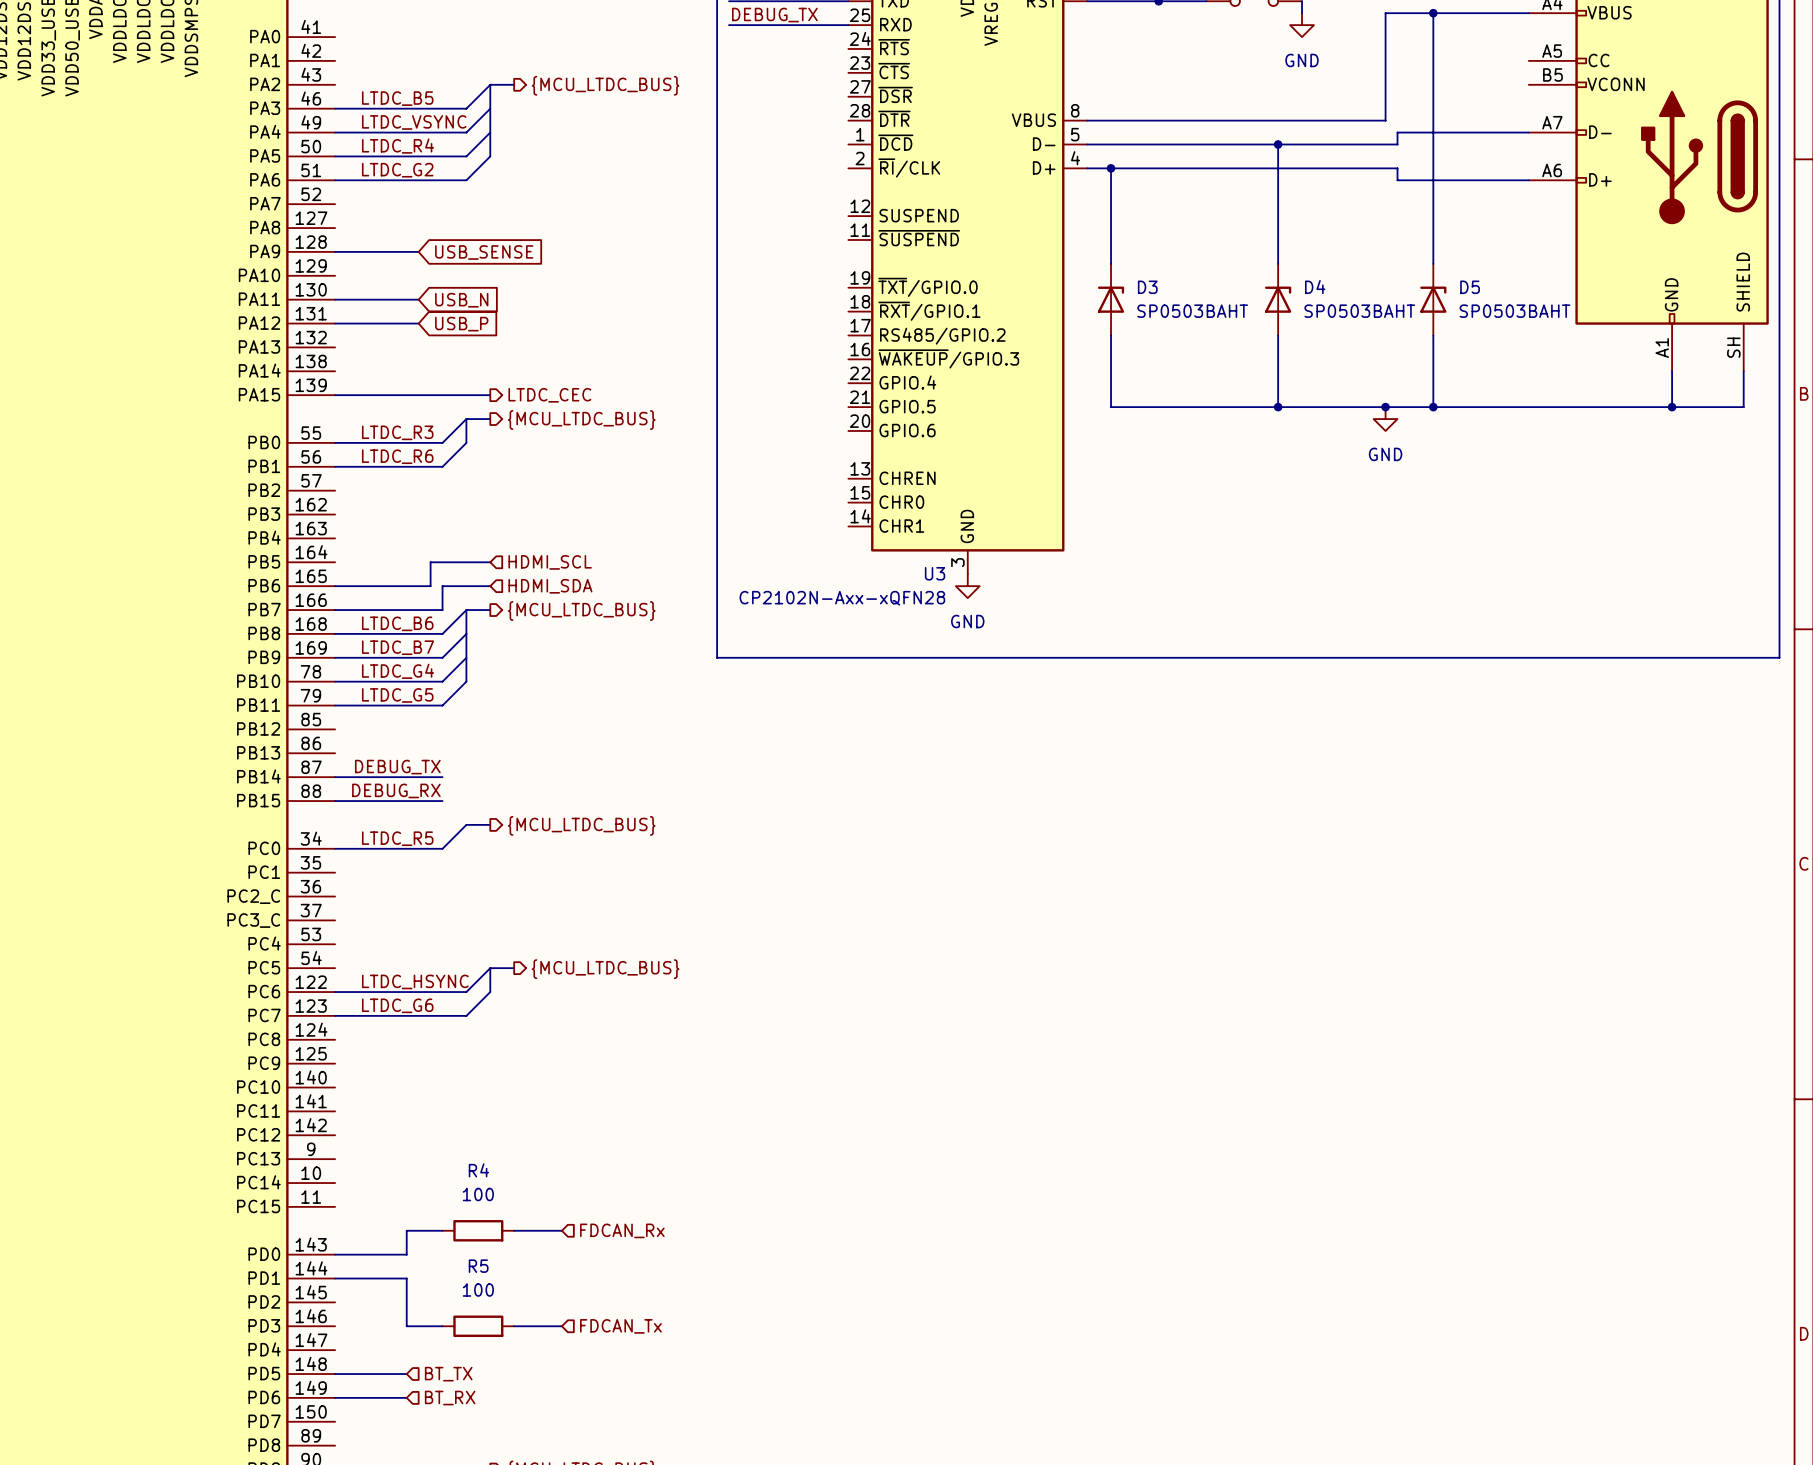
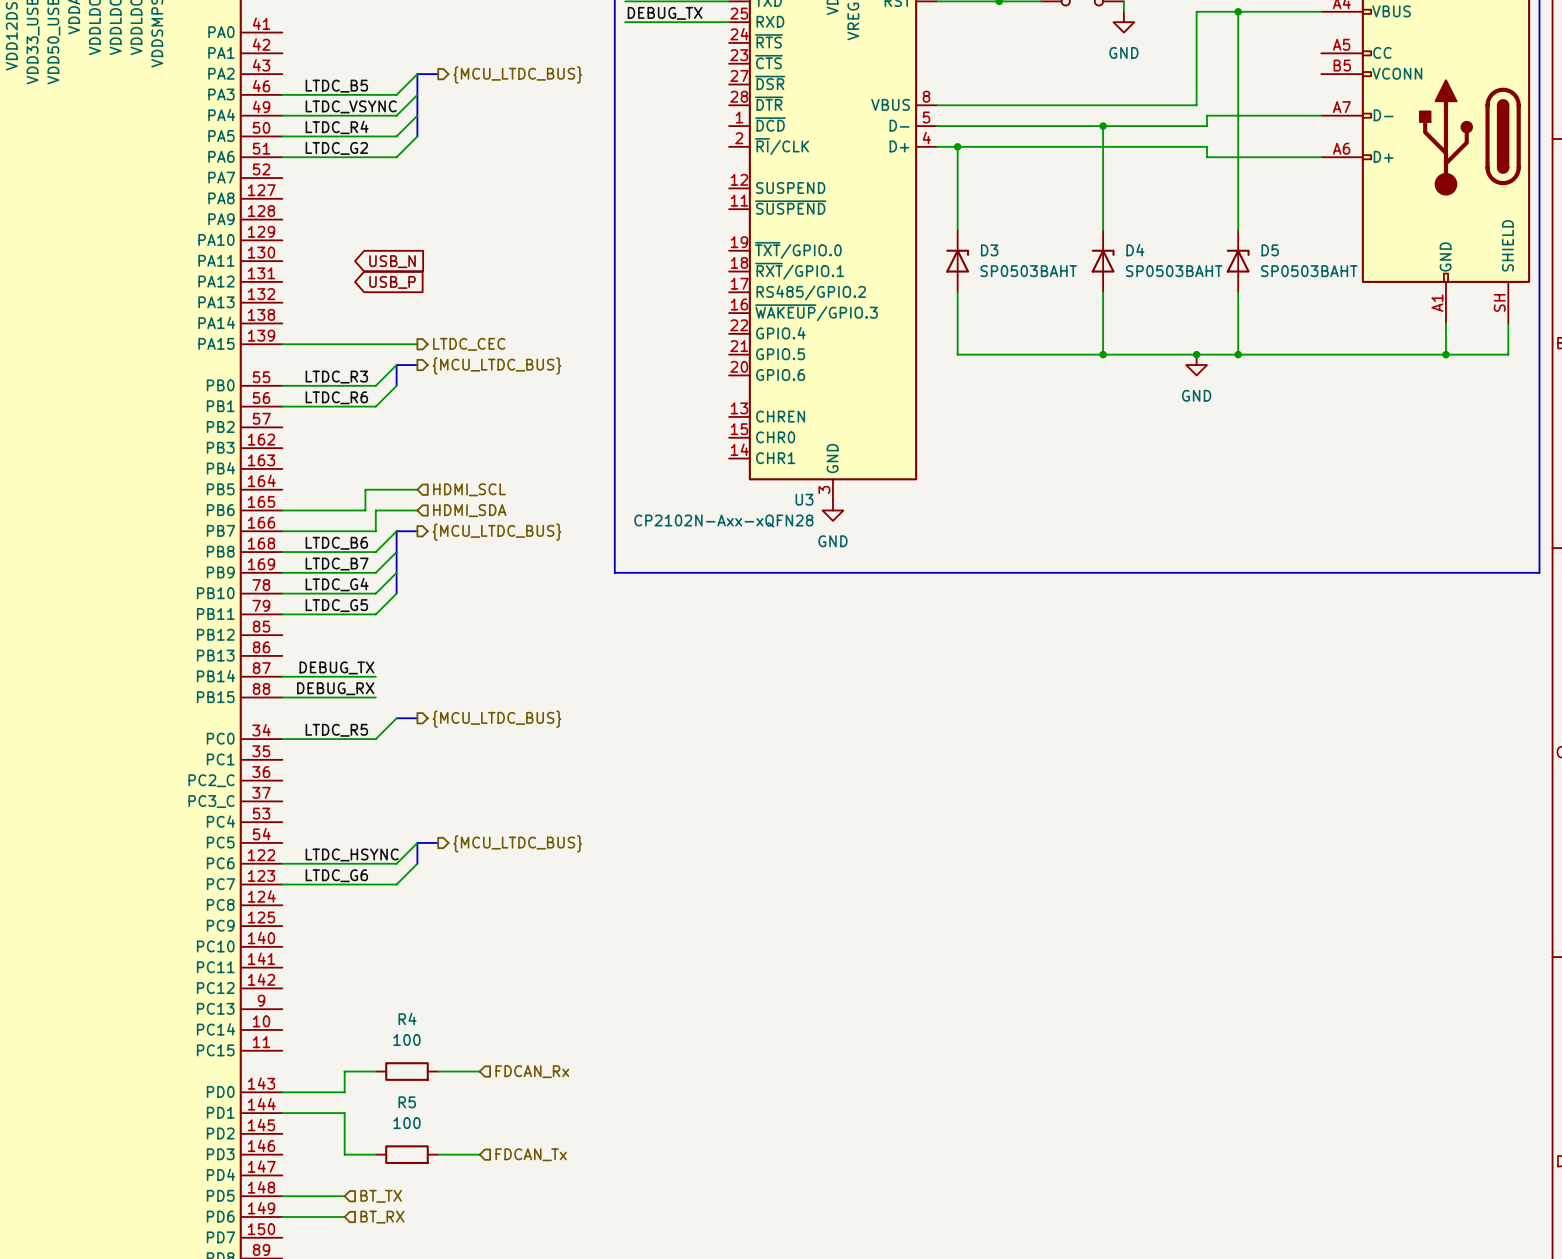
wire: (335, 251) (418, 251) -> none
global label: USB_SENSE (484, 252) -> none
wire: (335, 299) (418, 299) -> none
wire: (335, 323) (418, 323) -> none

